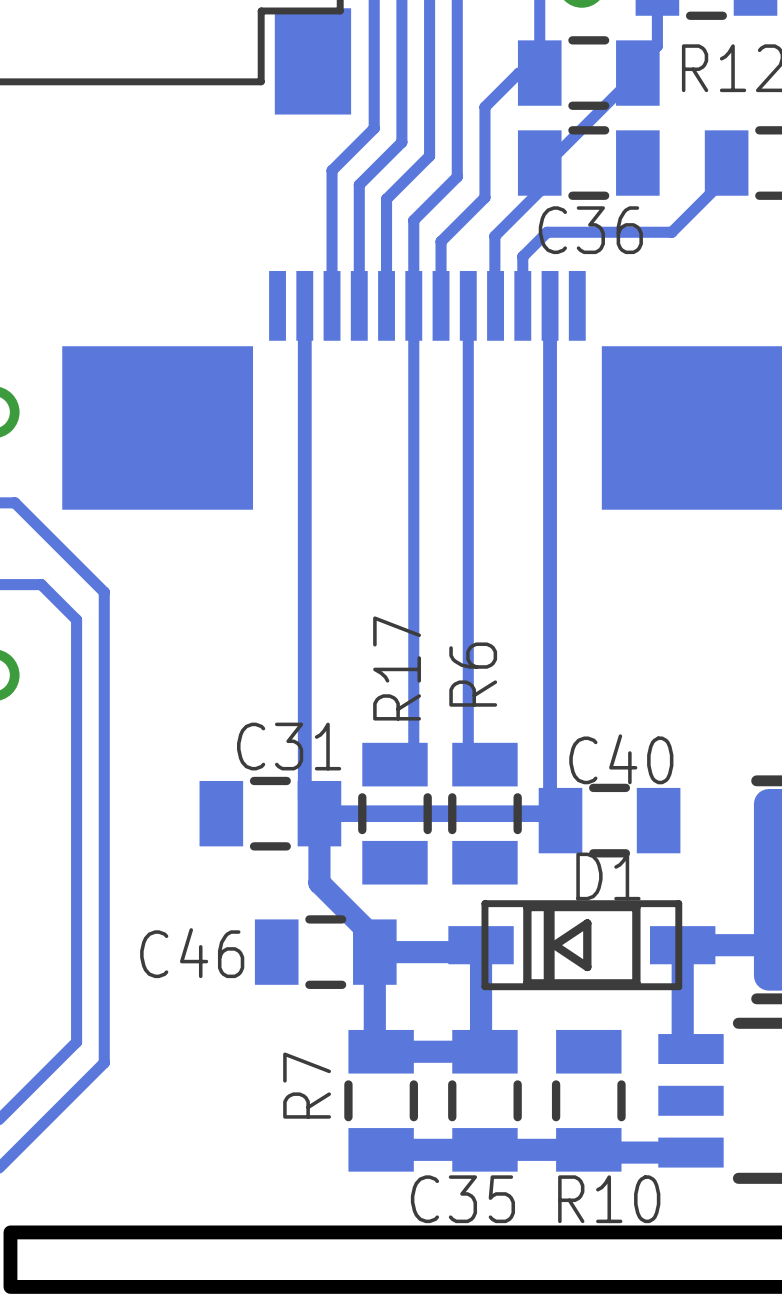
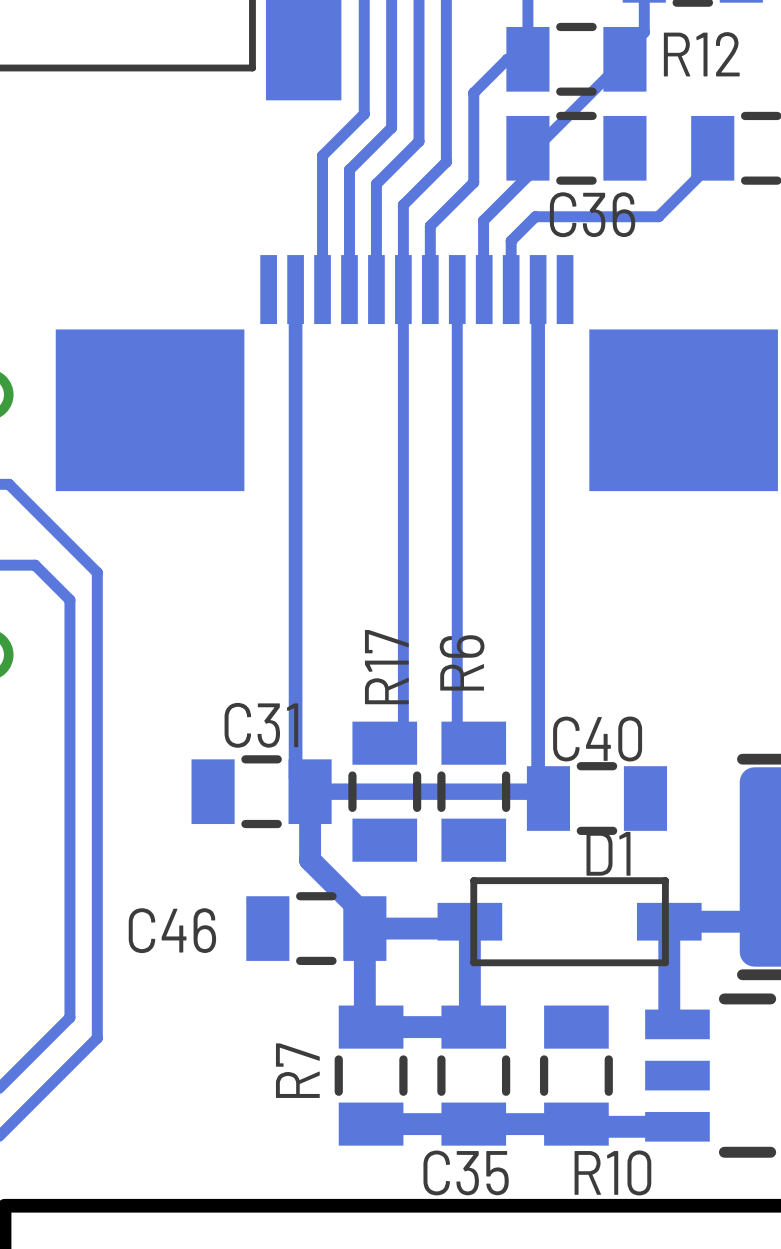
D1 footprint: [448, 900, 716, 991] -> [437, 877, 702, 967]

